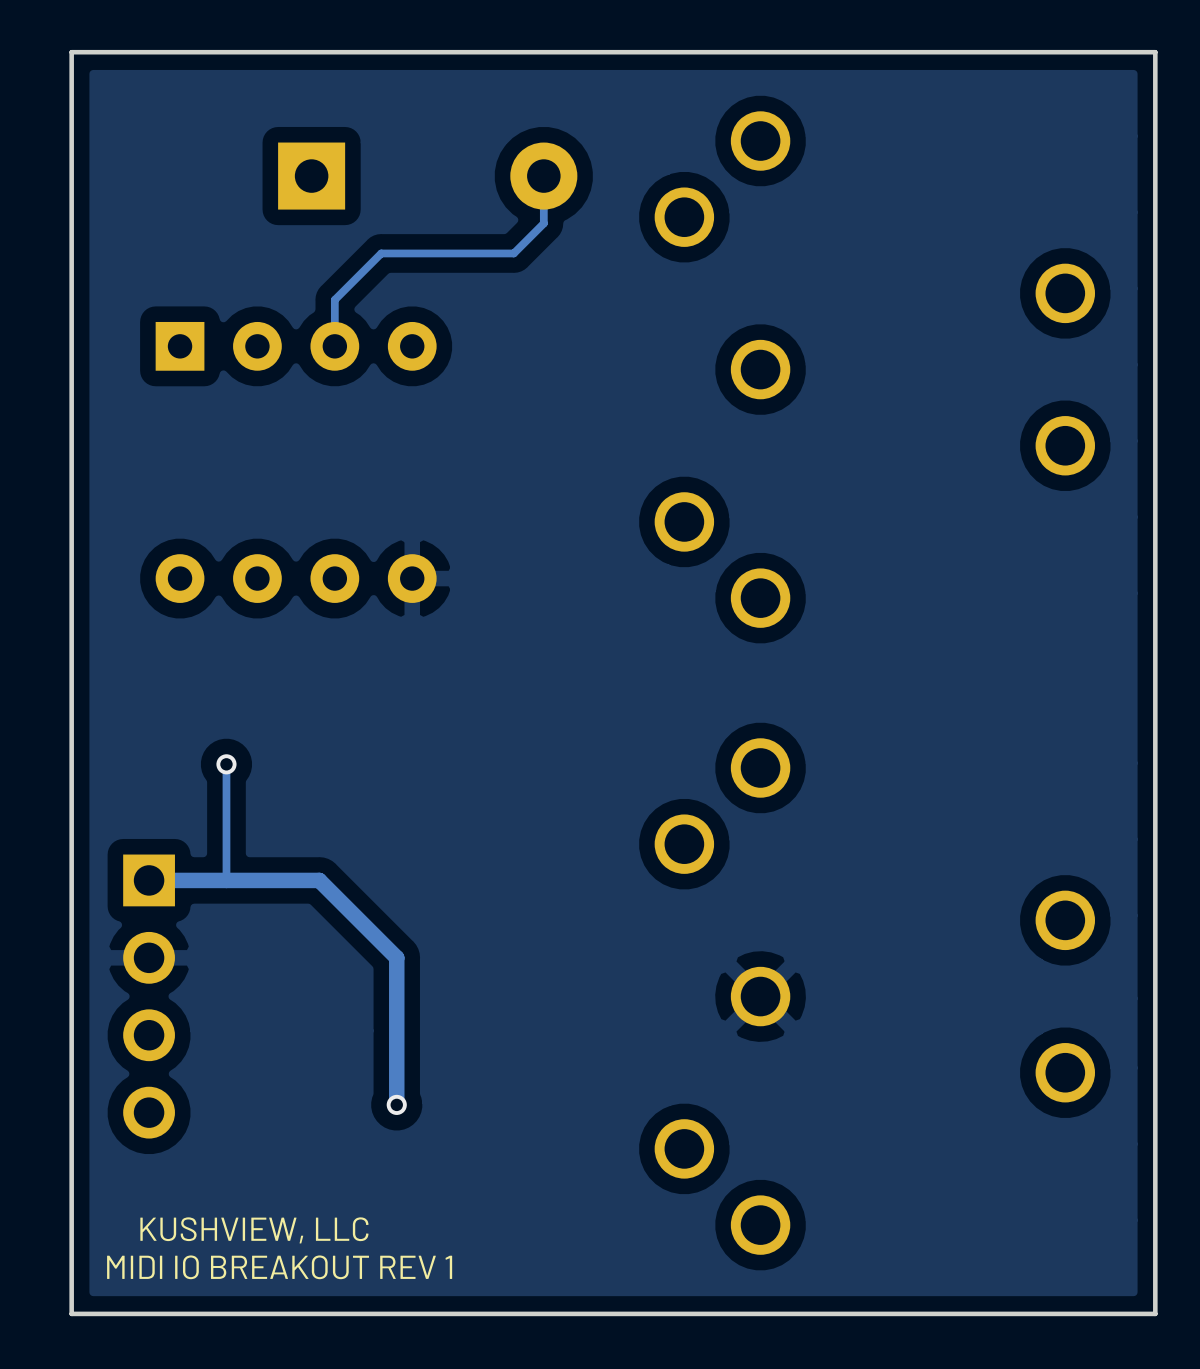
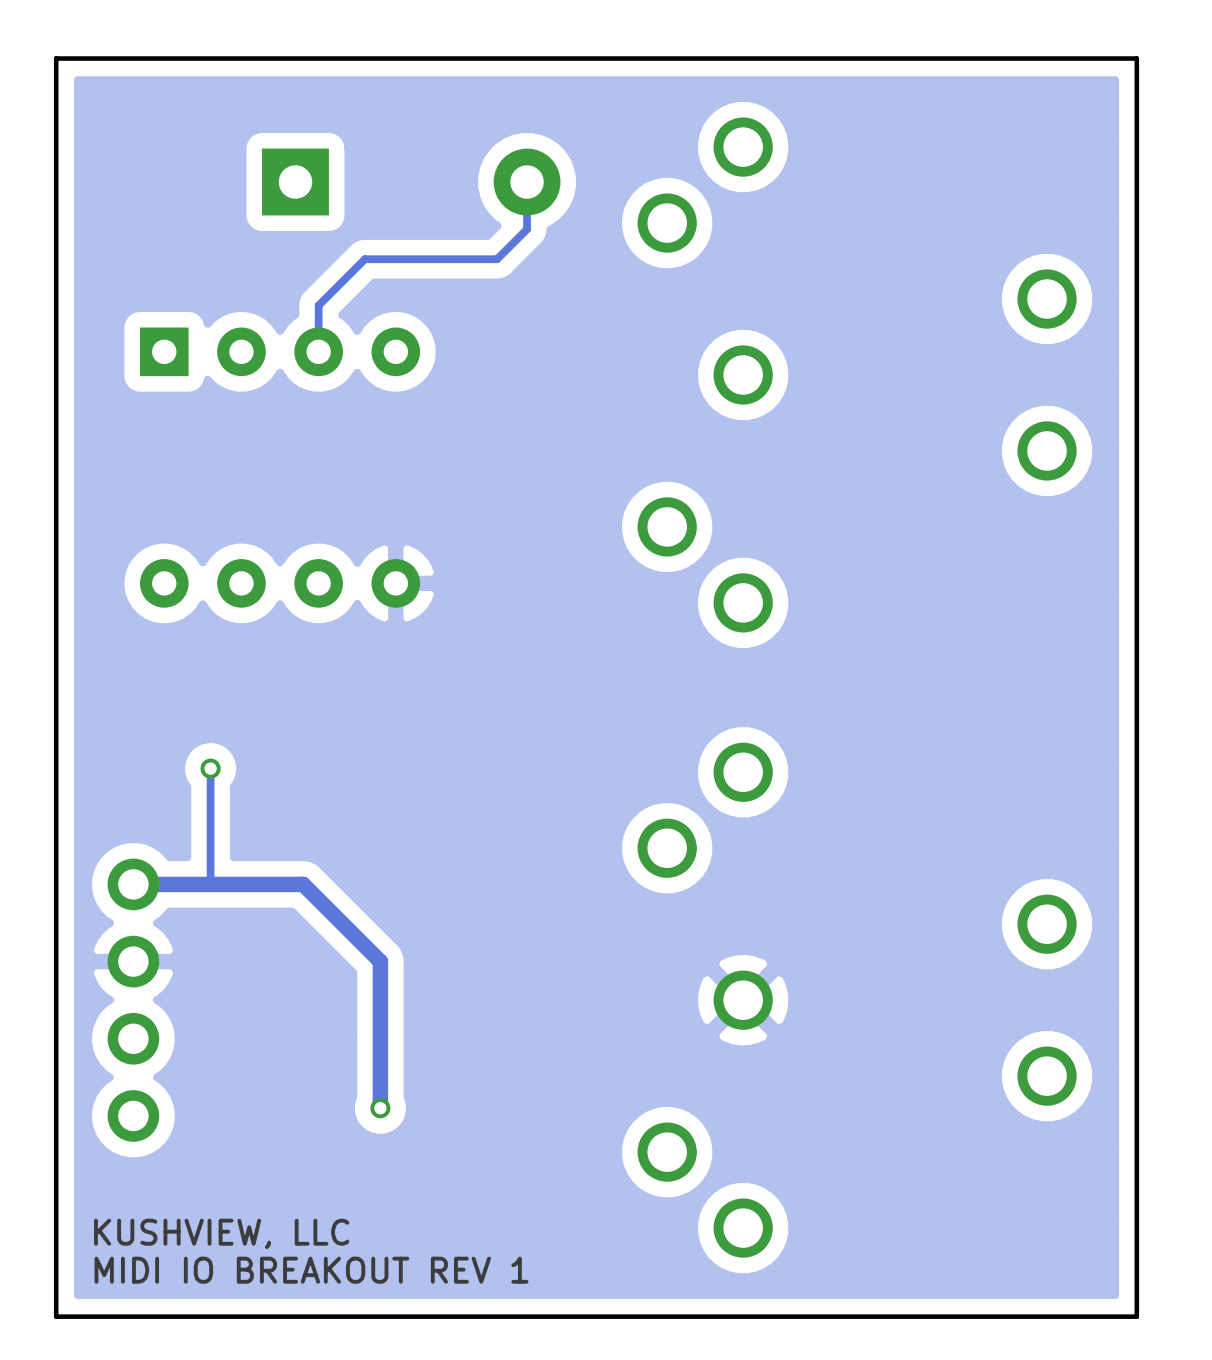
part footprint: [123, 854, 175, 1139] -> [107, 858, 160, 1142]

